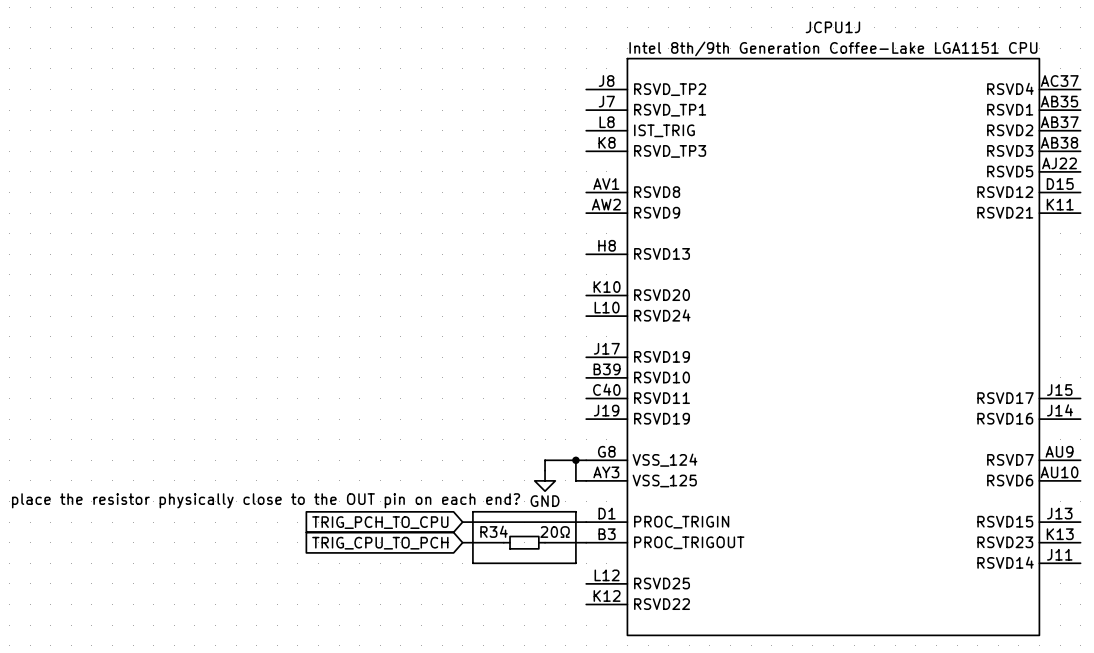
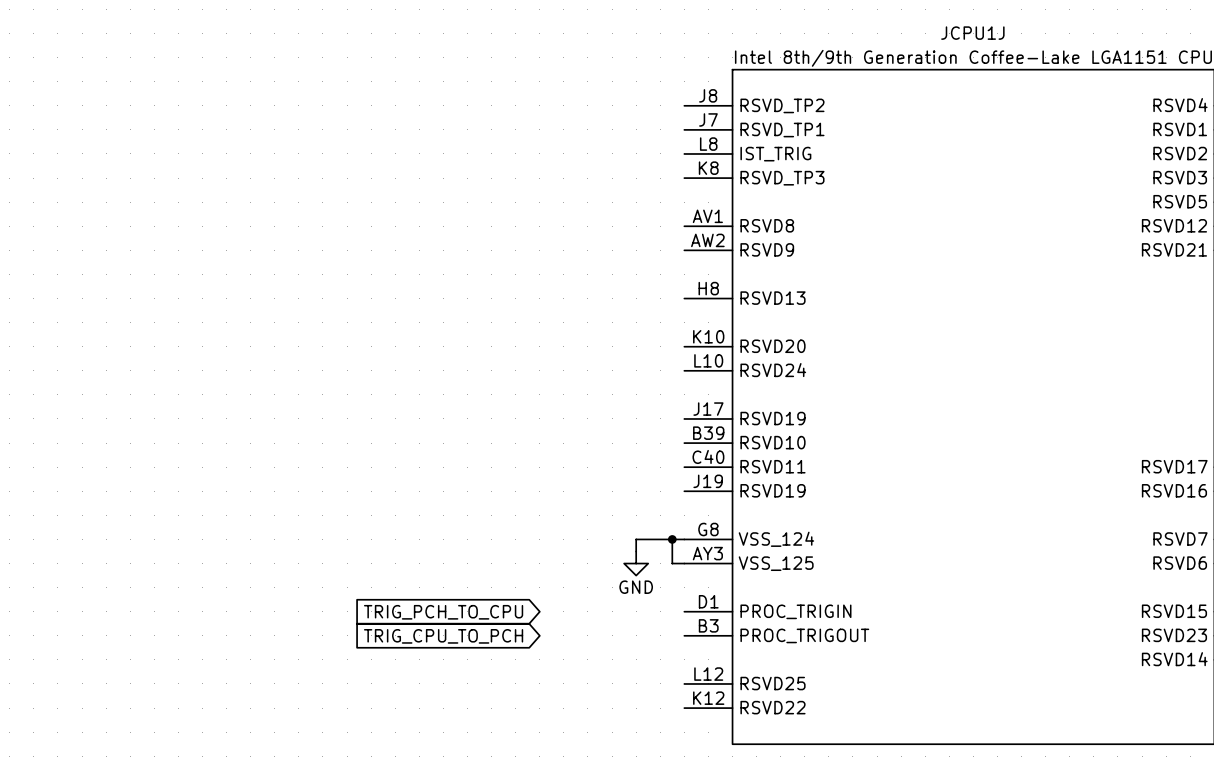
text: place the resistor physically close to the OUT pin on each end? (266, 500) -> none
line: (472, 511) (575, 511) (575, 563) (472, 563) (472, 511) -> none
wire: (462, 522) (586, 522) -> none
wire: (462, 542) (503, 542) -> none
R34: 20Ω (524, 542) -> none
wire: (545, 542) (586, 542) -> none

